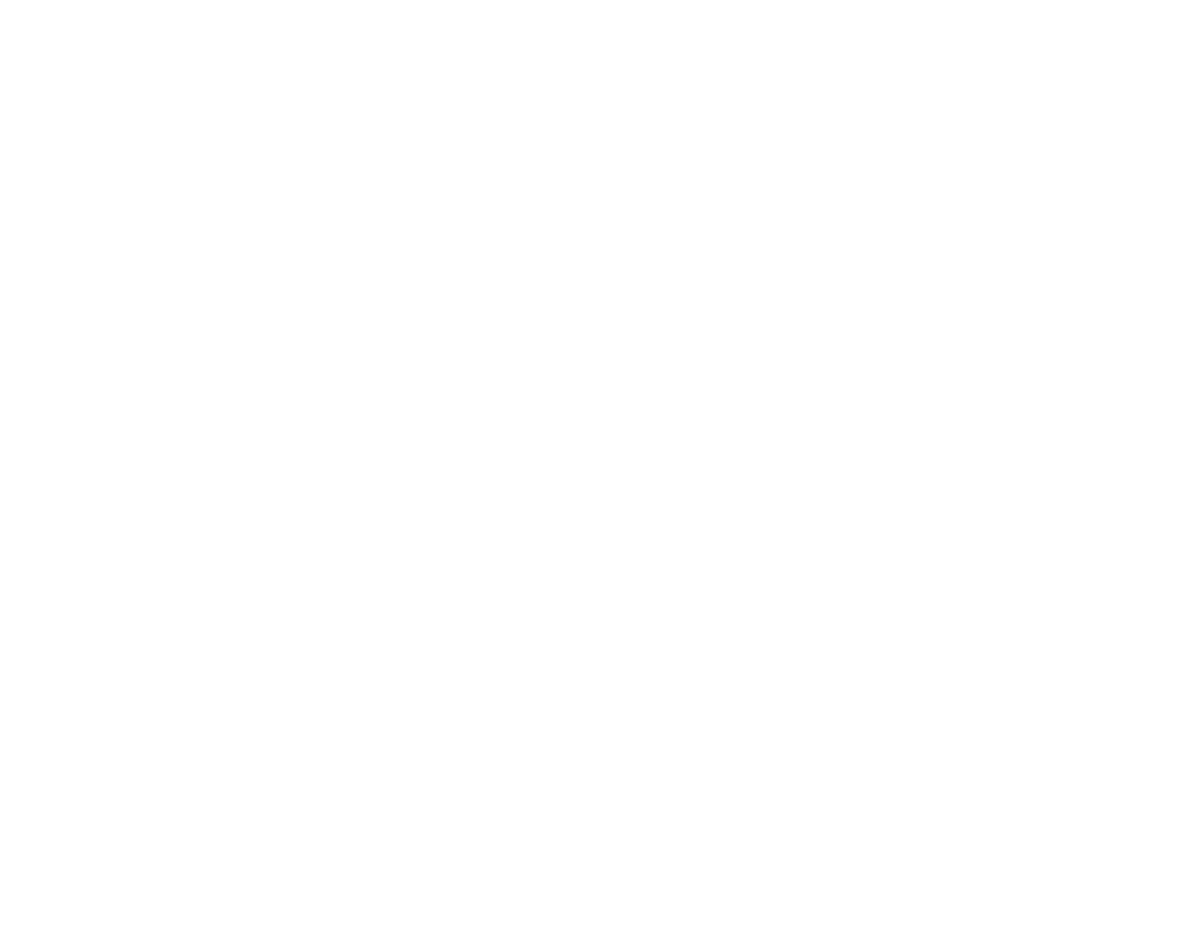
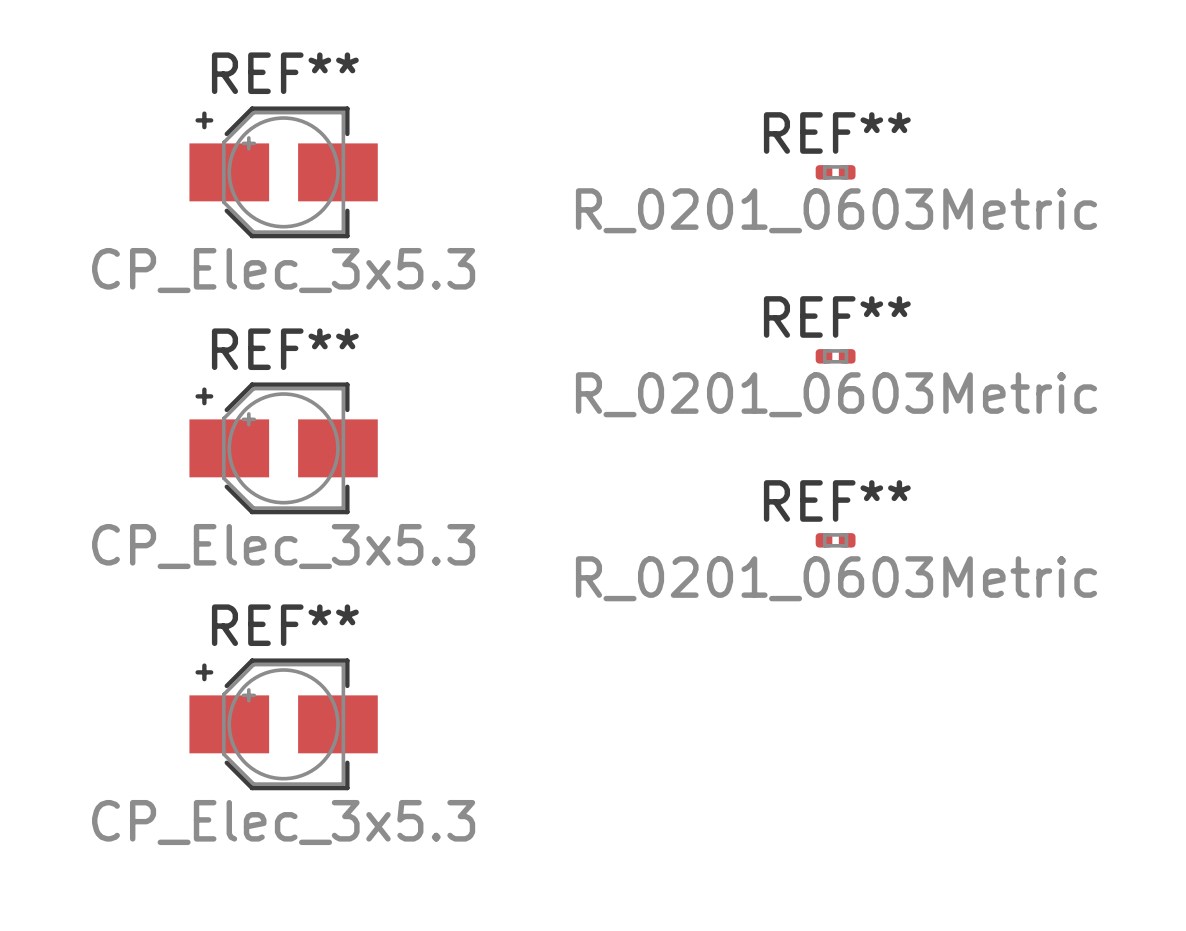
REF**: none -> CP_Elec_3x5.3 (283, 172)
REF**: none -> R_0201_0603Metric (835, 172)
REF**: none -> R_0201_0603Metric (835, 356)
REF**: none -> CP_Elec_3x5.3 (283, 448)
REF**: none -> R_0201_0603Metric (835, 540)
REF**: none -> CP_Elec_3x5.3 (283, 724)

